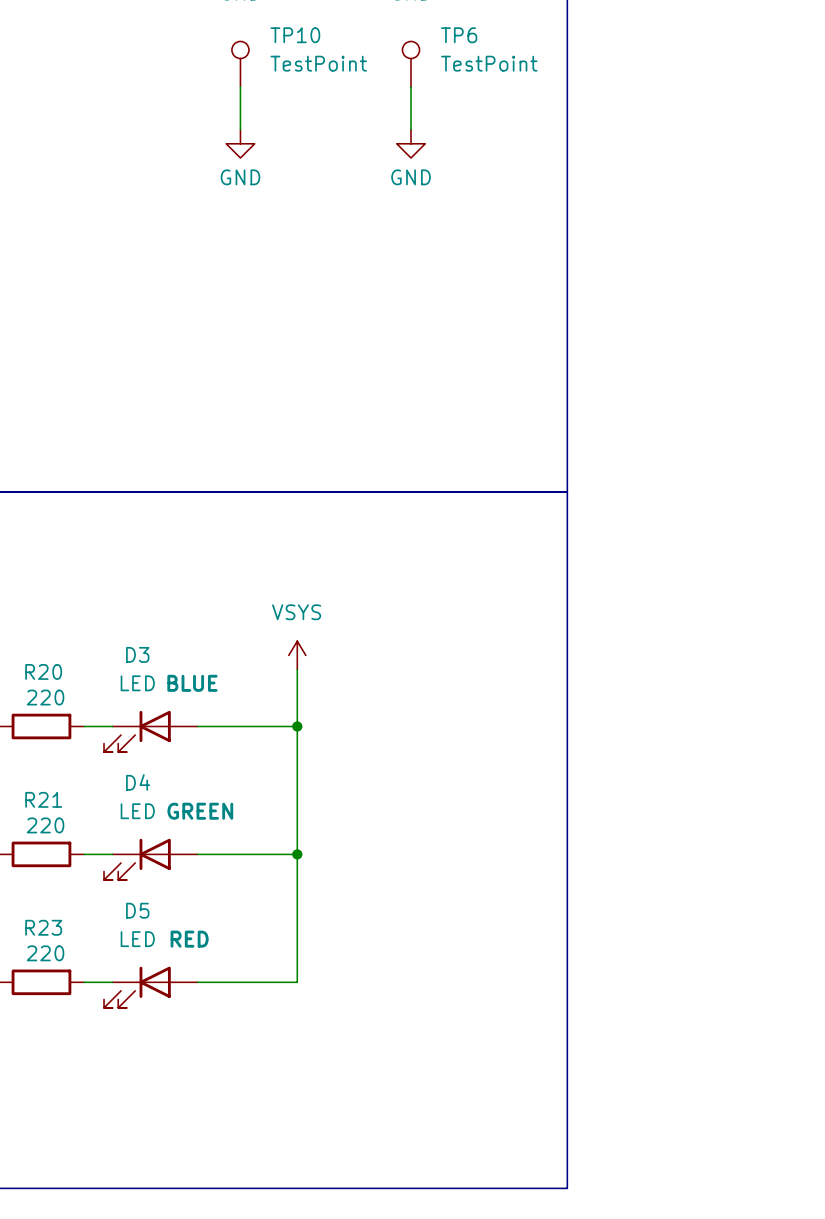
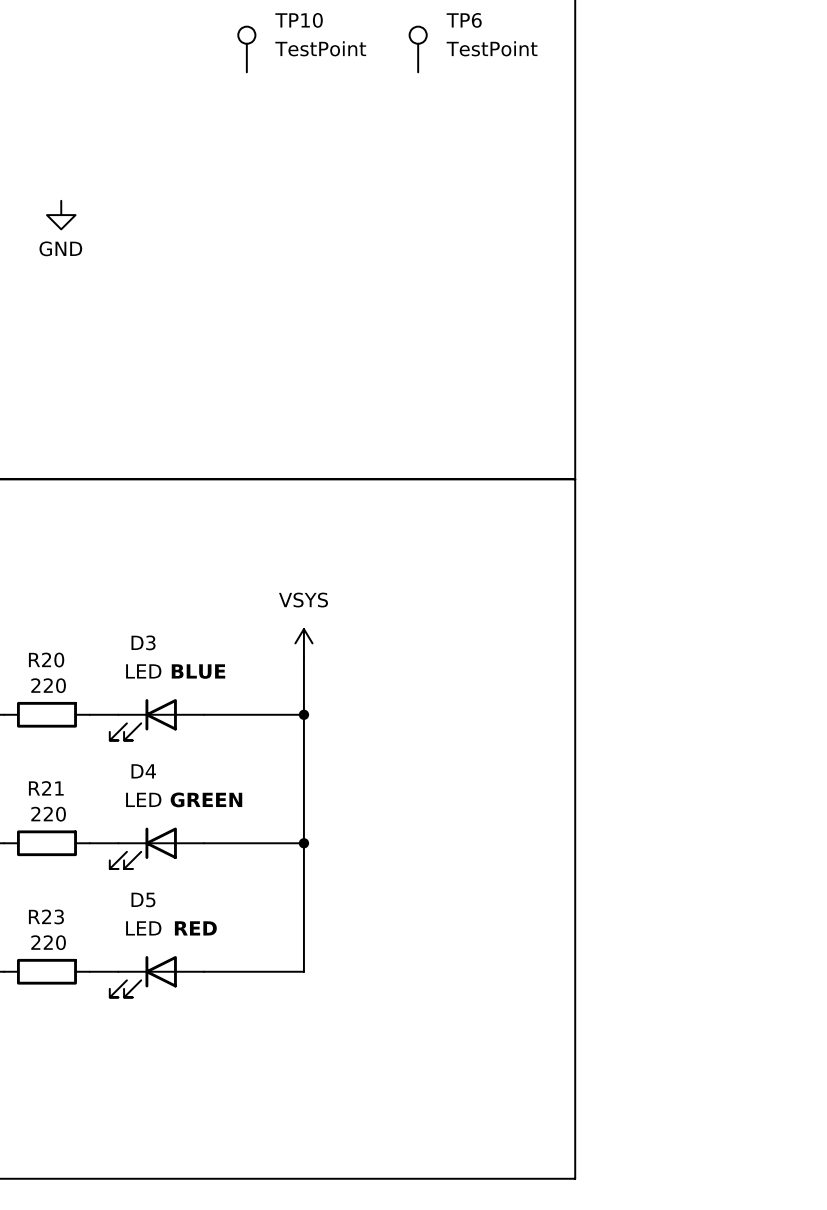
wire: (240, 86) (240, 129) -> none
wire: (411, 86) (411, 129) -> none
power symbol: GND (240, 143) -> none
power symbol: GND (411, 143) -> none
power symbol: none -> GND (61, 215)

